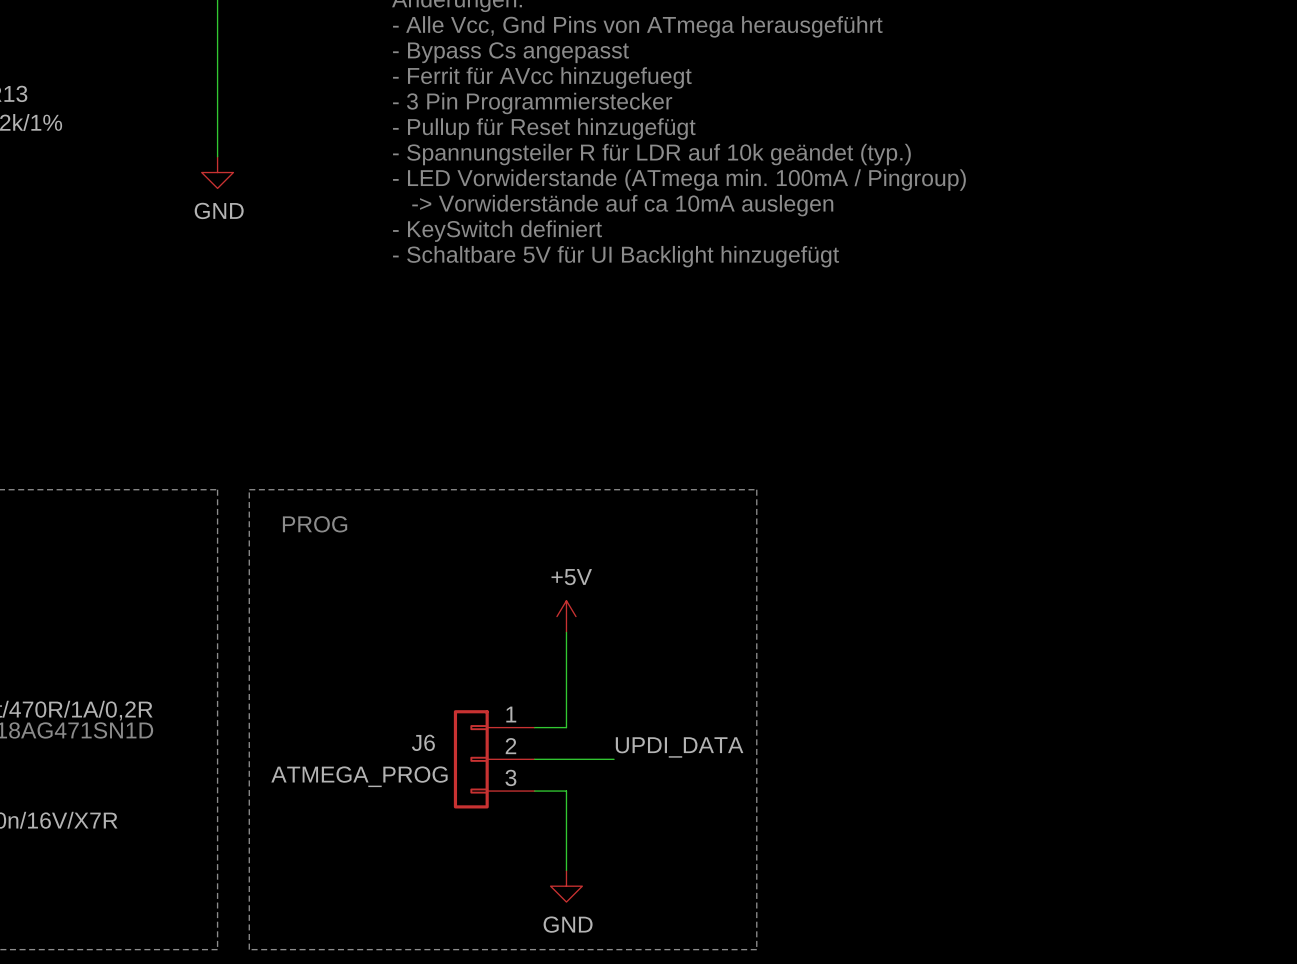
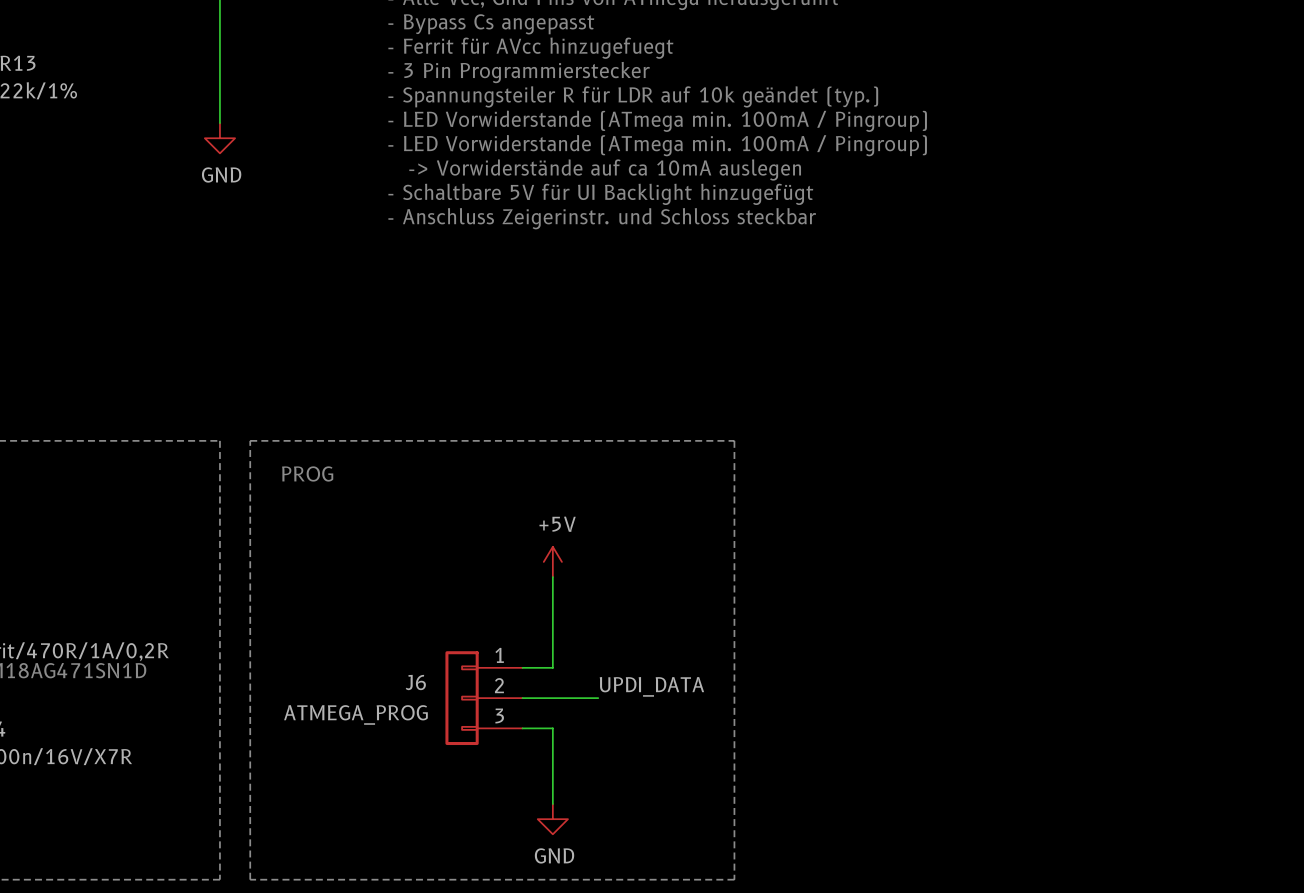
text: - Pullup für Reset hinzugefügt (544, 129) -> - Spannungsteiler R für LDR auf 10k geändet (typ.) (633, 96)
text: - Spannungsteiler R für LDR auf 10k geändet (typ.) (651, 154) -> - LED Vorwiderstande (ATmega min. 100mA / Pingroup) (657, 121)
text: - KeySwitch definiert (497, 231) -> - Schaltbare 5V für UI Backlight hinzugefügt (600, 194)
text: - Schaltbare 5V für UI Backlight hinzugefügt (616, 256) -> - Anschluss Zeigerinstr. und Schloss steckbar (602, 218)

